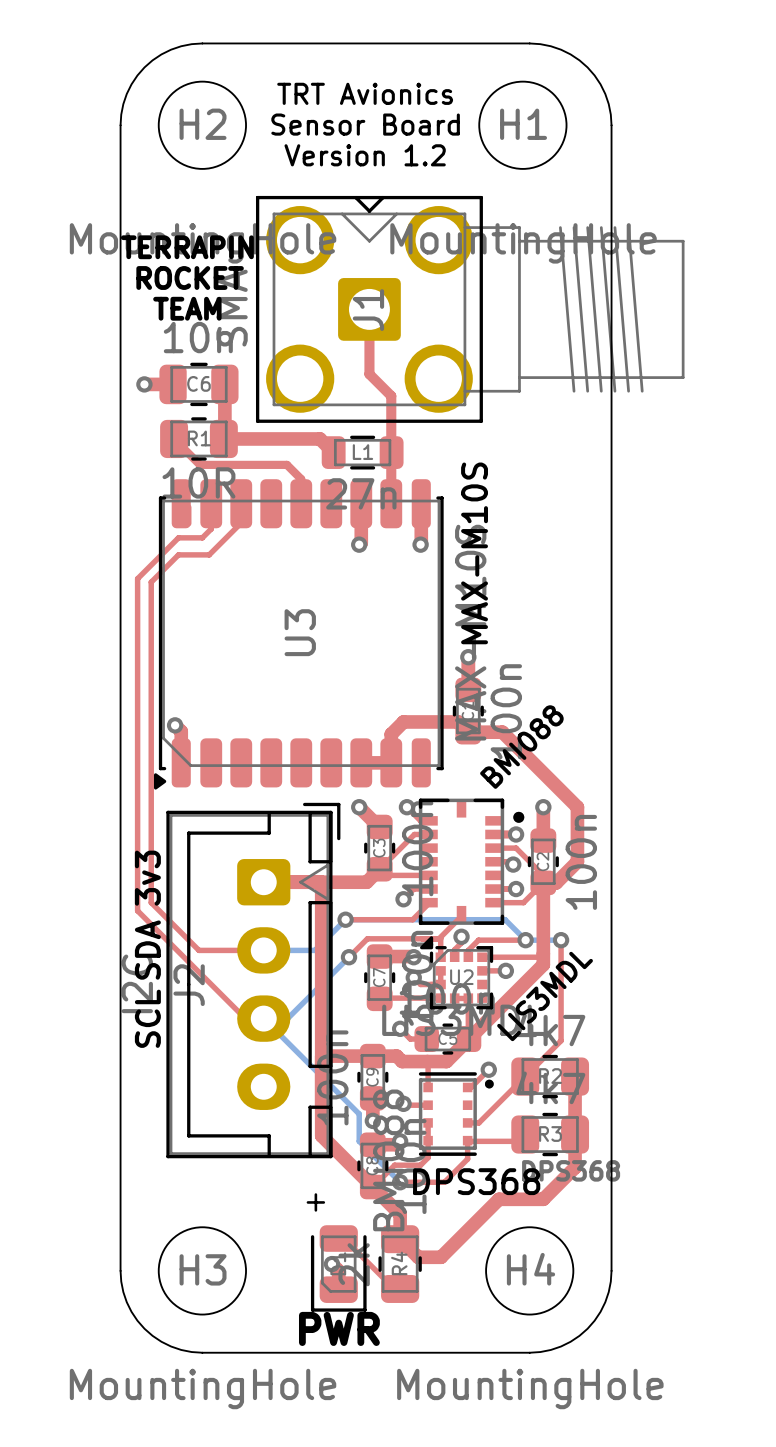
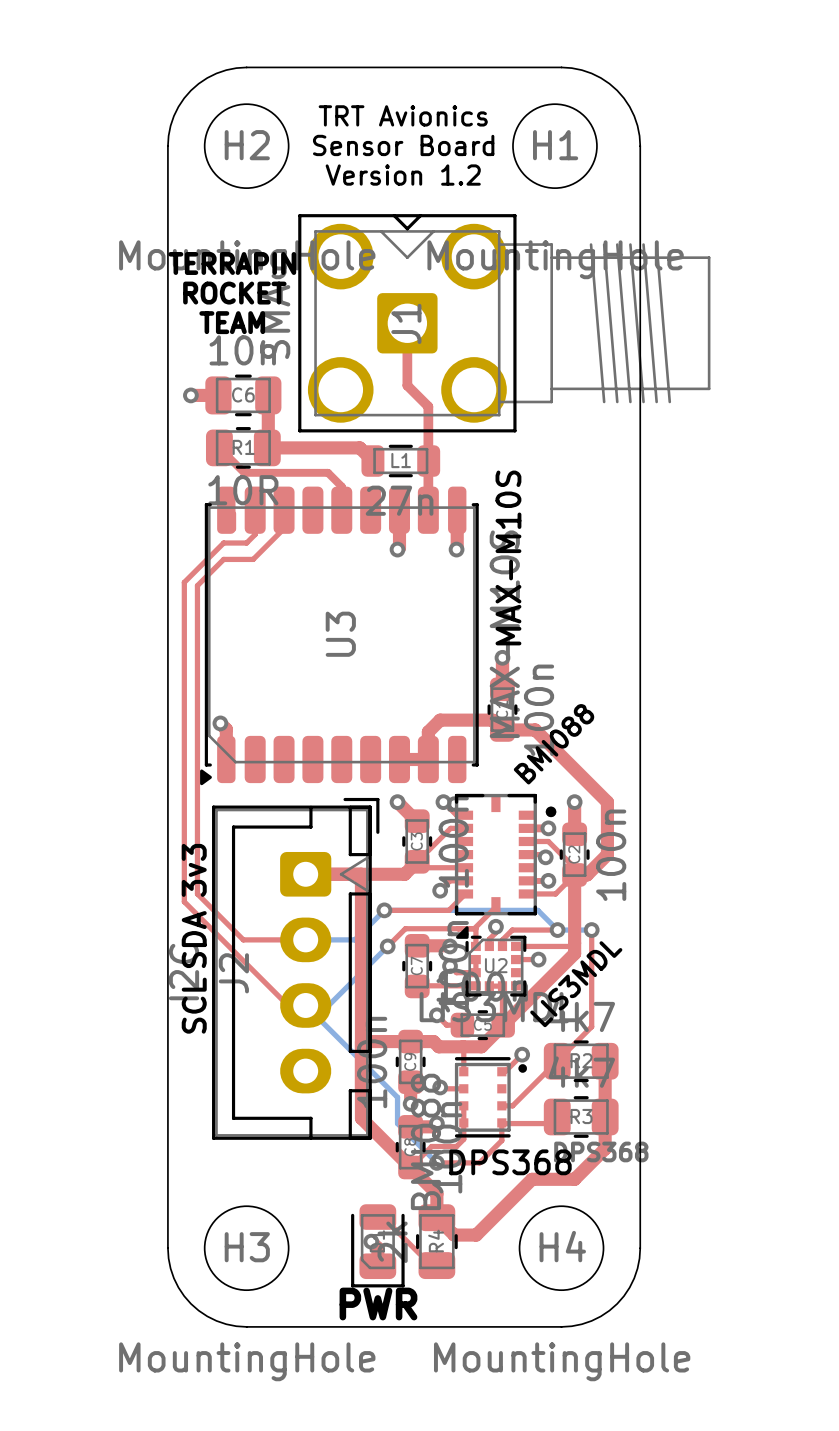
text: + (315, 1202) -> none

